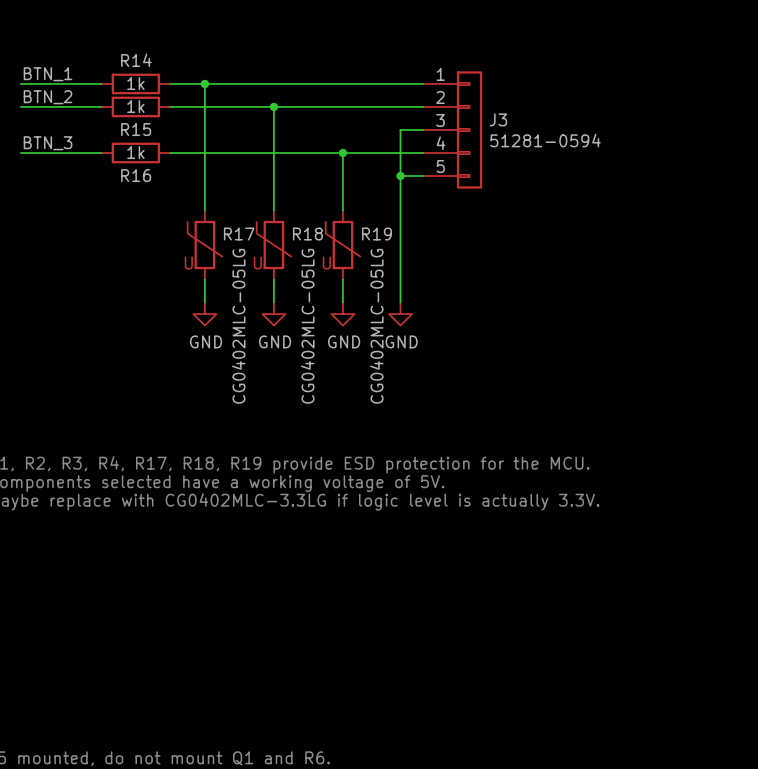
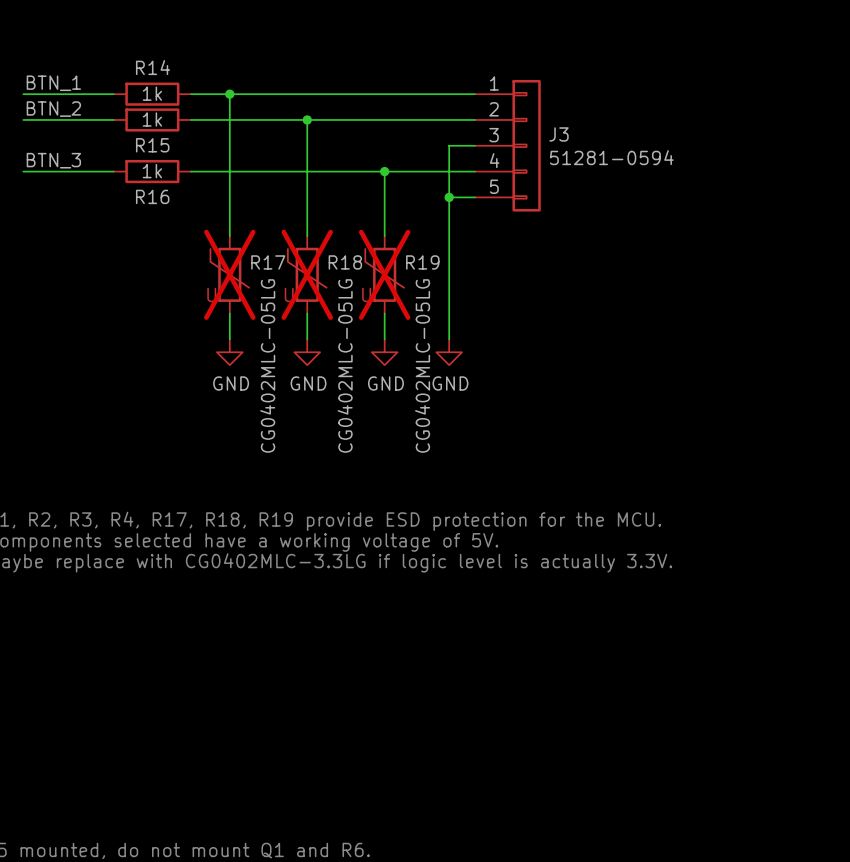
R17 do-not-place cross: none -> (229, 274)
R18 do-not-place cross: none -> (307, 274)
R19 do-not-place cross: none -> (384, 274)

